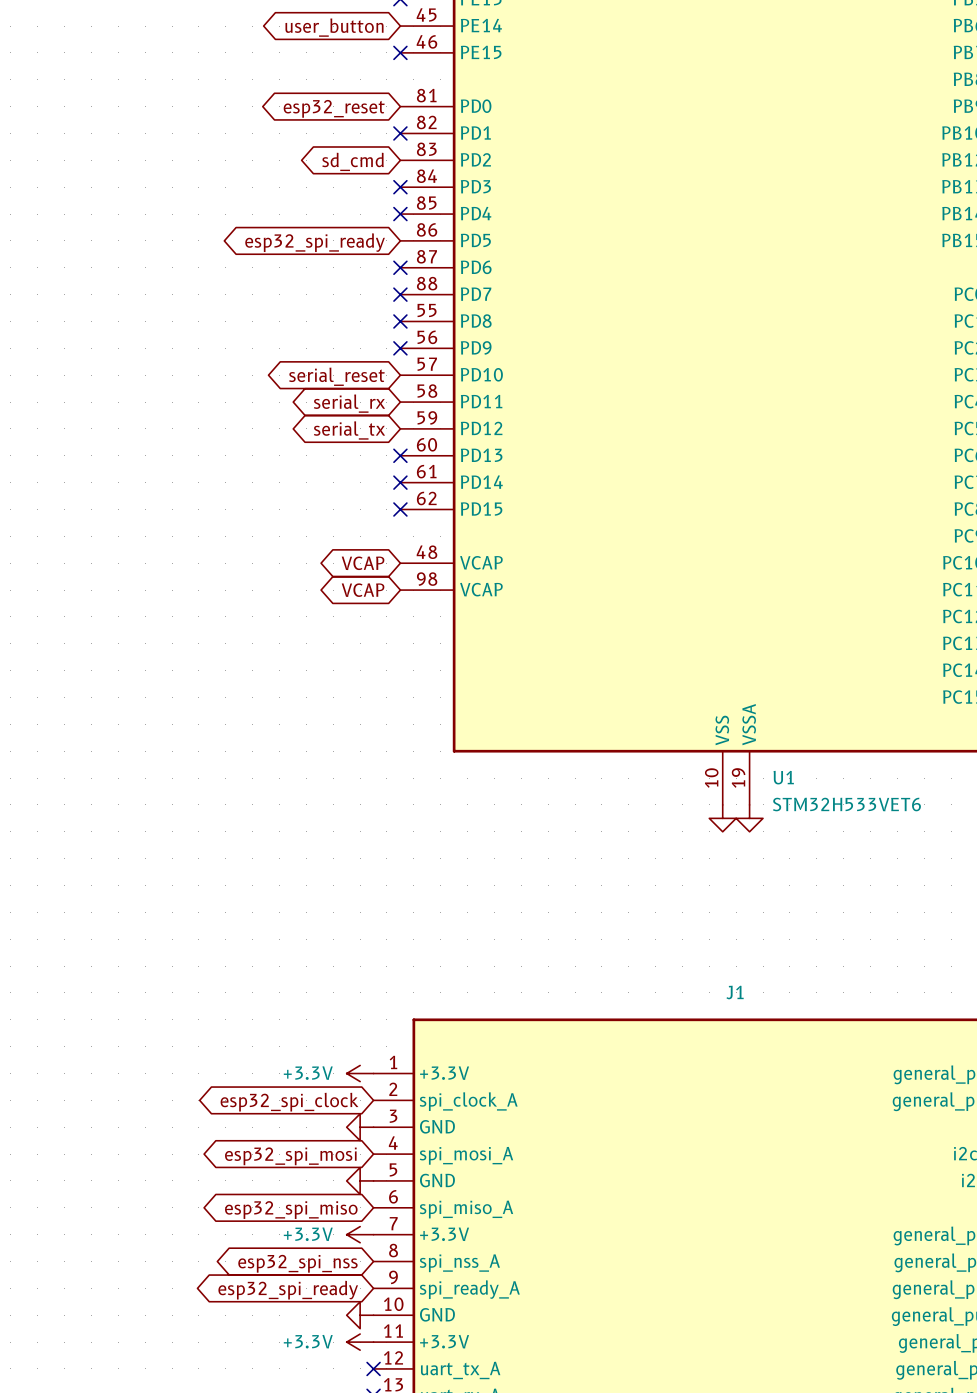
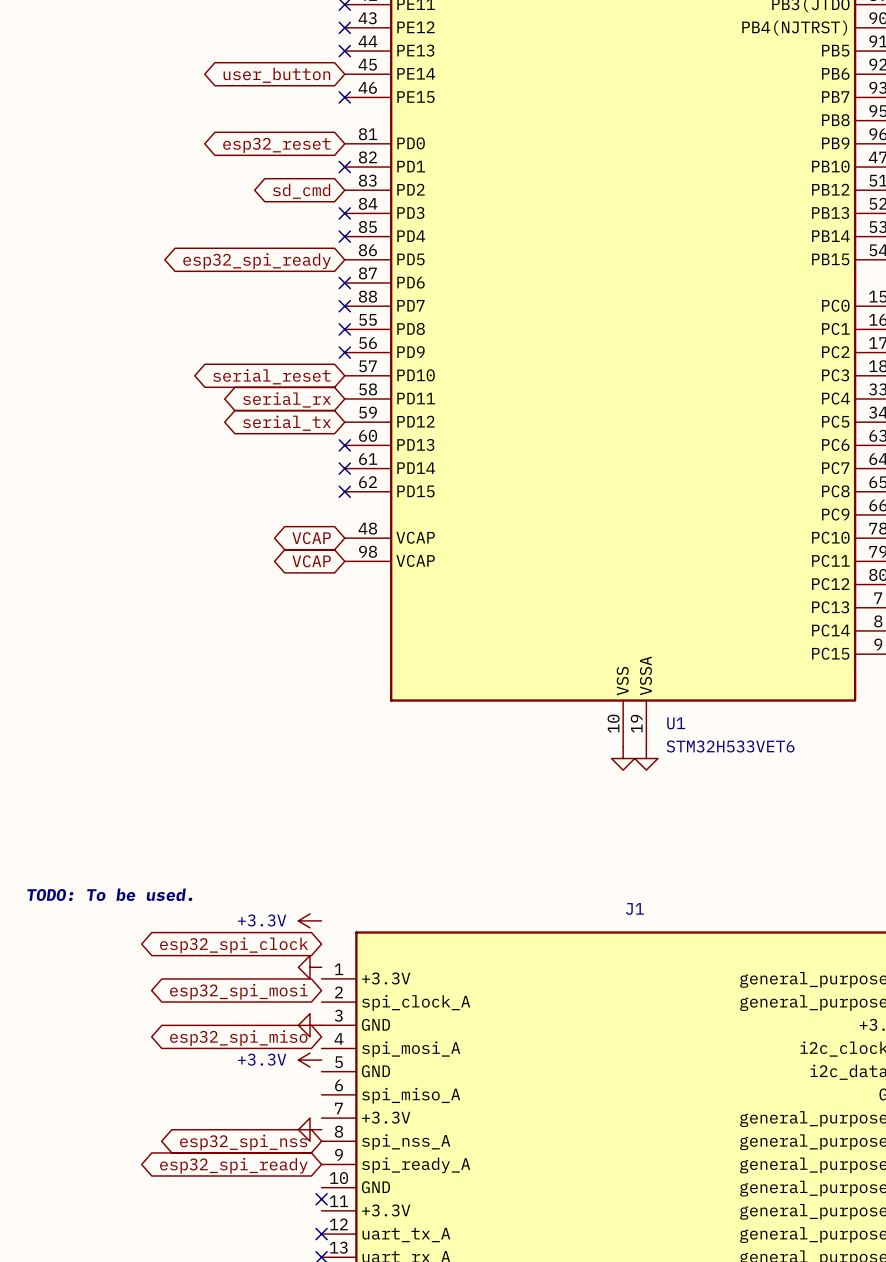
text: none -> TODO: To be used. (109, 894)
power symbol: none -> +3.3V (310, 920)
power symbol: none -> (310, 967)
power symbol: +3.3V (360, 1073) -> none
global label position: esp32_spi_clock (289, 1102) -> esp32_spi_clock (234, 945)
global label position: esp32_spi_mosi (290, 1156) -> esp32_spi_mosi (238, 991)
power symbol: none -> +3.3V (310, 1060)
power symbol: (360, 1180) -> none
global label position: esp32_spi_miso (291, 1210) -> esp32_spi_miso (238, 1038)
power symbol: +3.3V (360, 1234) -> none
power symbol: none -> (310, 1129)
power symbol: (360, 1315) -> none
no-connect mark: none -> (321, 1199)
power symbol: +3.3V (360, 1342) -> none

